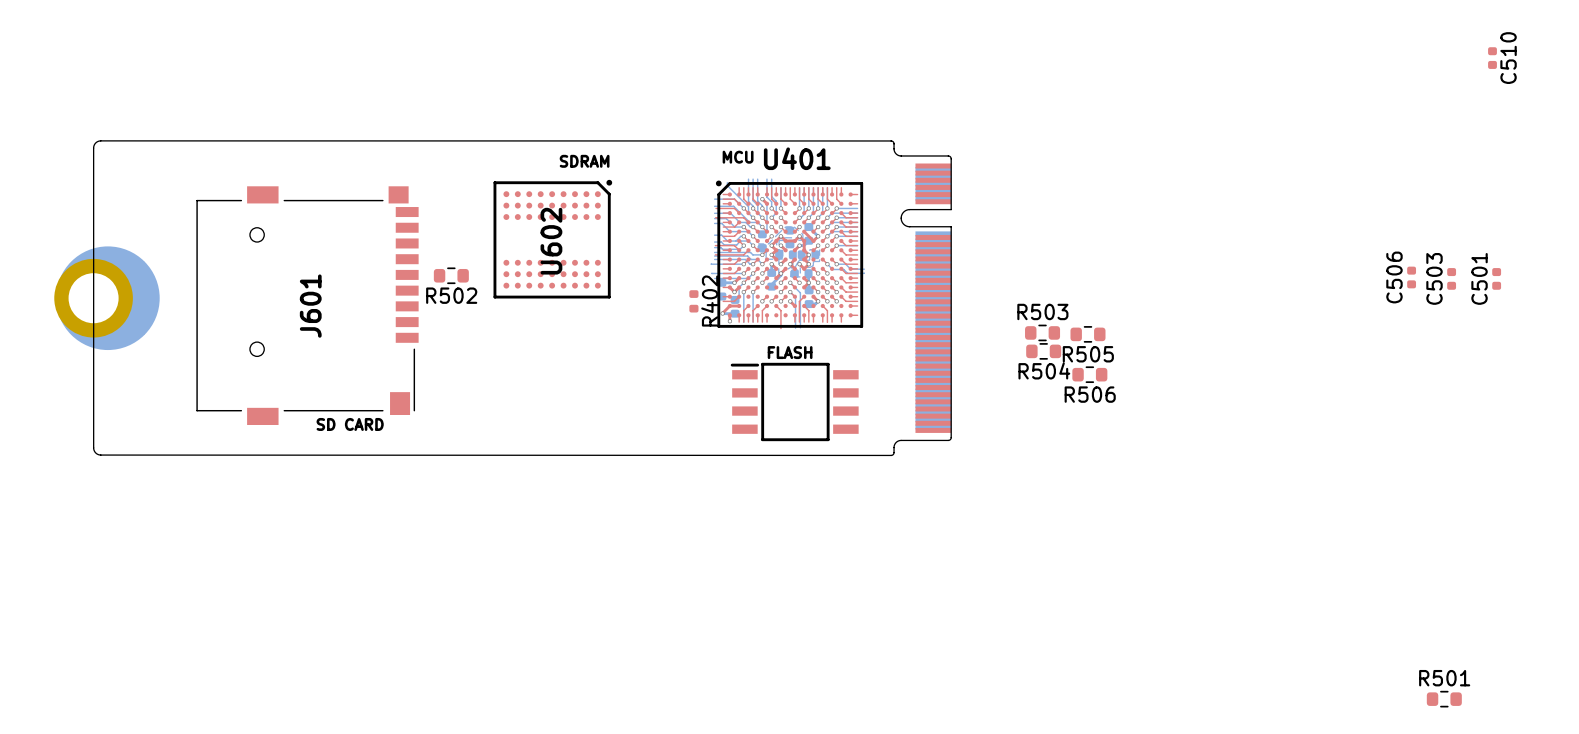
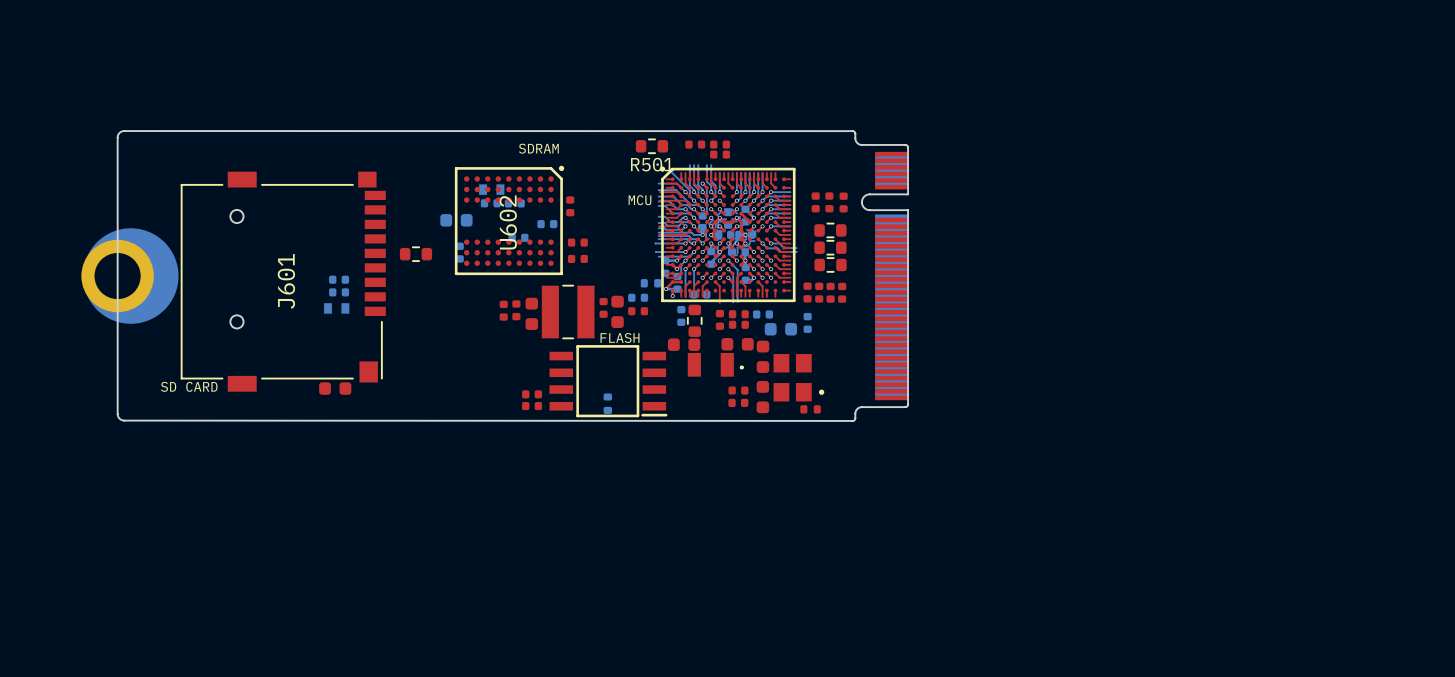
C510: (1492, 58) -> none
part: none -> (695, 144)
part: none -> (720, 144)
text position: MCU (738, 157) -> MCU (640, 200)
U401 name: U401 (797, 158) -> none
part: none -> (720, 154)
part: none -> (491, 189)
part: none -> (815, 202)
part: none -> (829, 202)
part: none -> (843, 202)
part: none -> (490, 203)
part: none -> (514, 203)
part: none -> (570, 206)
part: none -> (456, 220)
part: none -> (547, 224)
part: none -> (830, 230)
part: none -> (518, 237)
part: none -> (577, 242)
part: none -> (830, 247)
part: none -> (459, 252)
C506: (1411, 277) -> none
C503: (1451, 278) -> none
C501: (1496, 278) -> none
part: none -> (577, 258)
part: none -> (830, 264)
R502 name: R502 (451, 295) -> none
part position: (502, 298) -> (494, 275)
R402 side: top (693, 301) -> bottom (651, 283)
part: none -> (339, 279)
part: none -> (339, 292)
part: none -> (807, 292)
part: none -> (819, 292)
part: none -> (830, 292)
part: none -> (842, 292)
part: none -> (700, 294)
part: none -> (638, 297)
R503: (1042, 332) -> none
part: none -> (336, 308)
part: none -> (603, 307)
R505: (1087, 334) -> none
part: none -> (516, 310)
part: none -> (503, 310)
part: none -> (638, 311)
part: none -> (568, 312)
part: none -> (617, 311)
part: none -> (531, 313)
part: none -> (738, 314)
part: none -> (762, 314)
part: none -> (681, 315)
part: none -> (719, 319)
part: none -> (694, 320)
part: none -> (807, 322)
R504: (1043, 351) -> none
text position: FLASH (790, 352) -> FLASH (619, 337)
part: none -> (738, 324)
part: none -> (780, 329)
part: none -> (684, 344)
part: none -> (737, 344)
R506: (1089, 374) -> none
part: none -> (762, 356)
part: none -> (715, 364)
part rotation: 0° (794, 401) -> 180° (608, 381)
part position: (794, 401) -> (608, 381)
part: none -> (798, 377)
part: none -> (335, 388)
part: none -> (738, 390)
text position: SD CARD (350, 424) -> SD CARD (189, 386)
part: none -> (532, 394)
part: none -> (762, 397)
part: none -> (738, 402)
part: none -> (607, 403)
part: none -> (532, 406)
part: none -> (810, 409)
R501 name position: R501 (1444, 678) -> R501 (652, 164)
R501 position: (1444, 699) -> (651, 146)

